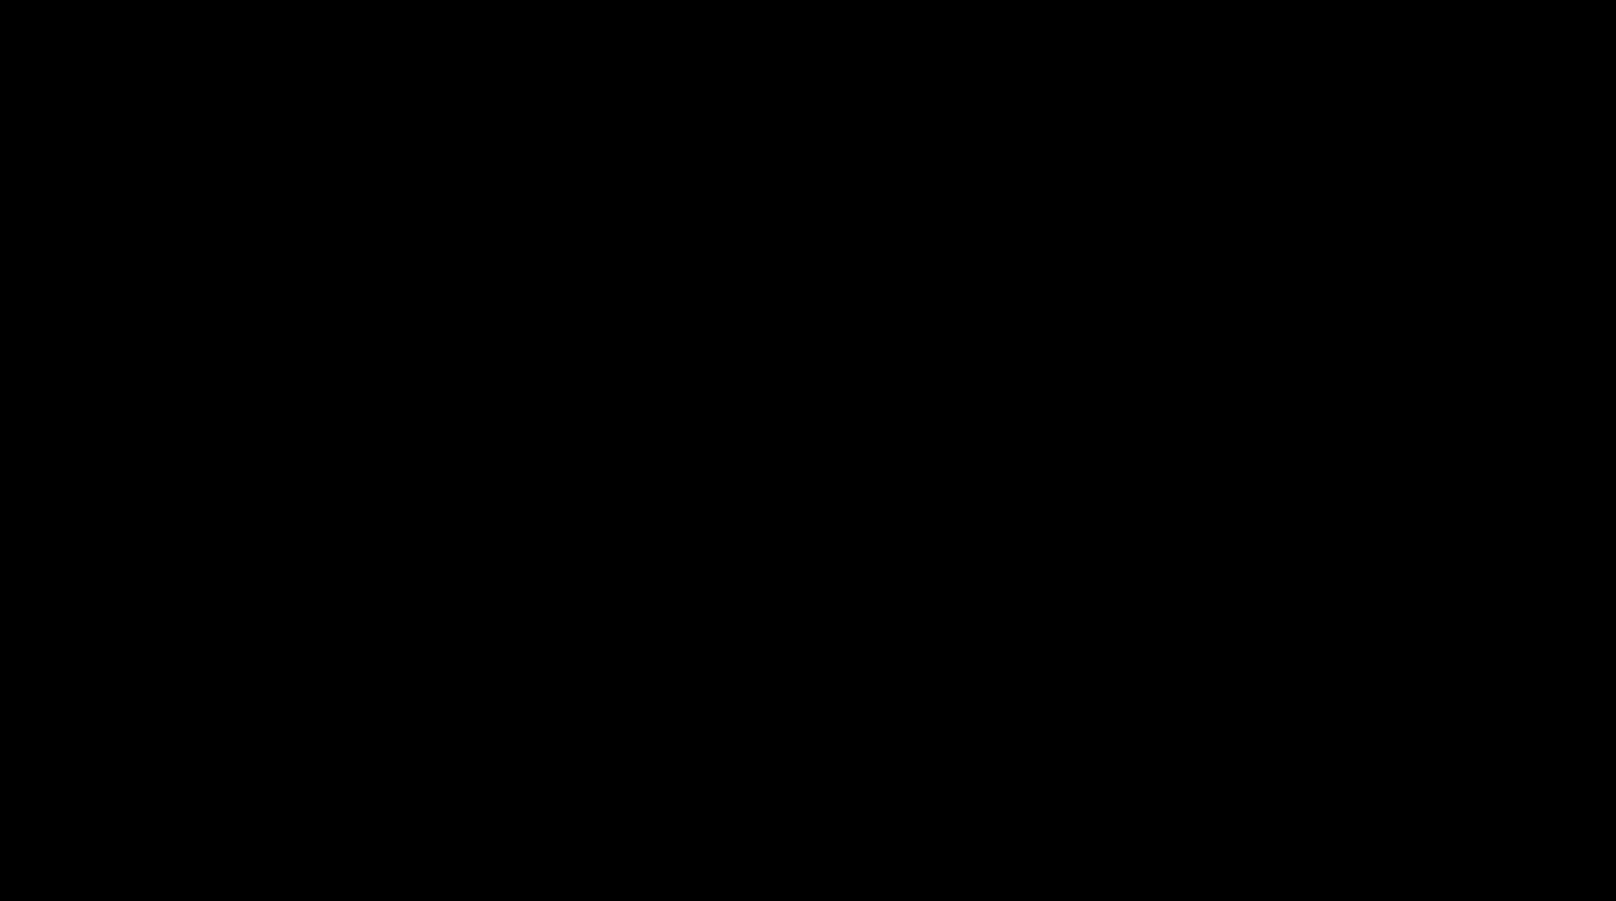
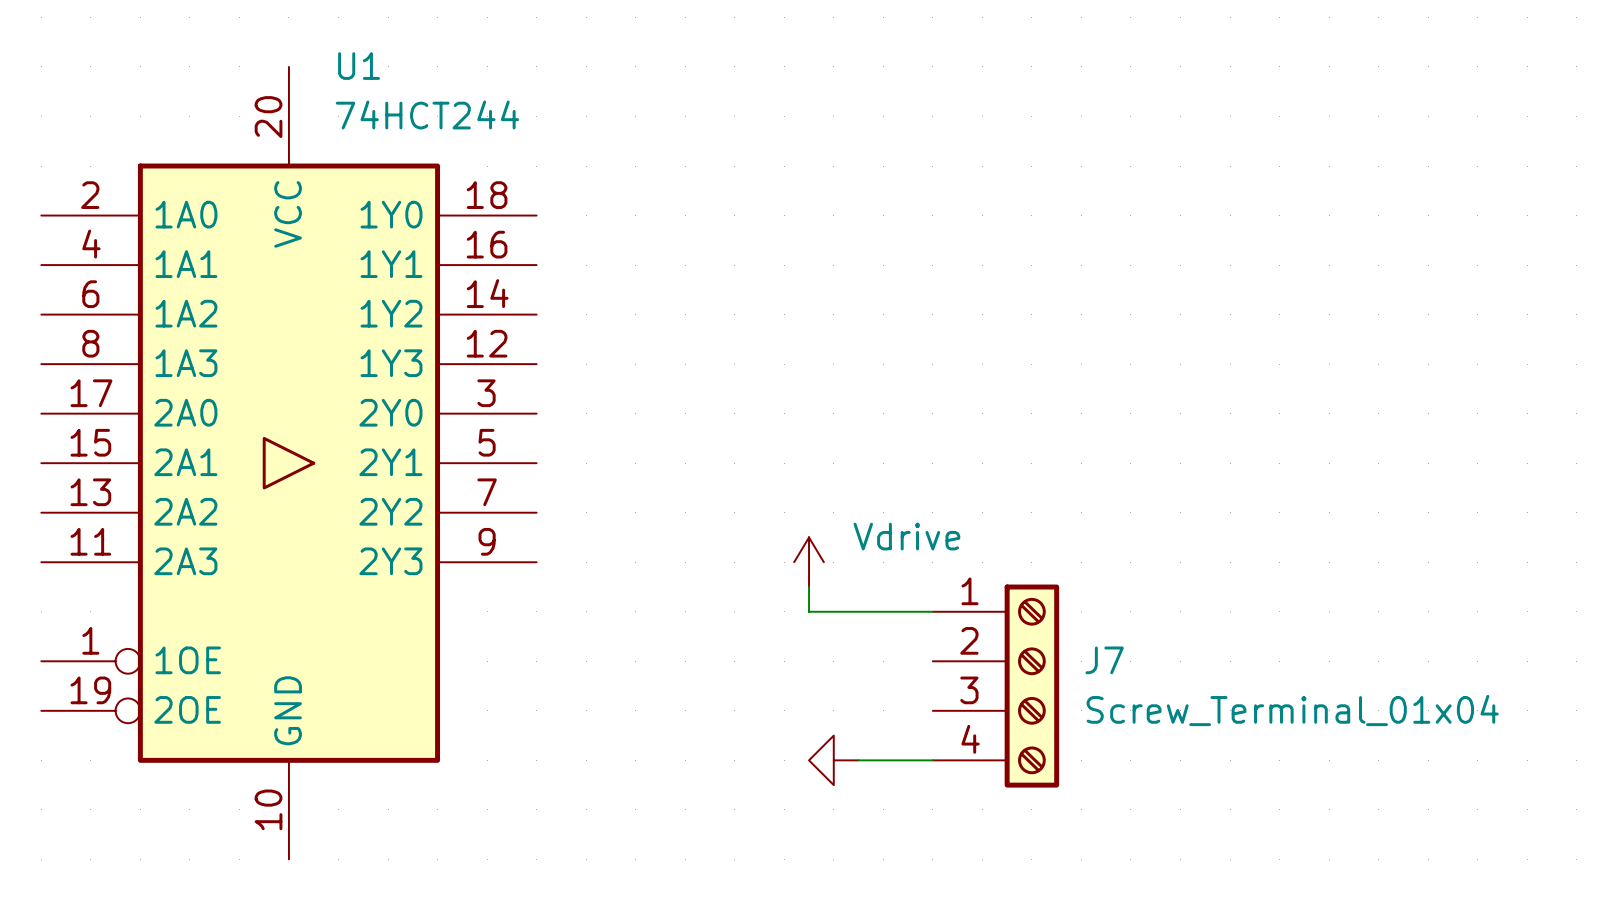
U1: none -> 74HCT244 (288, 463)
power symbol: none -> Vdrive (809, 562)
wire: none -> (809, 587) (809, 611) (932, 611)
J7: none -> Screw_Terminal_01x04 (995, 686)
power symbol: none -> (833, 760)
wire: none -> (858, 760) (932, 760)

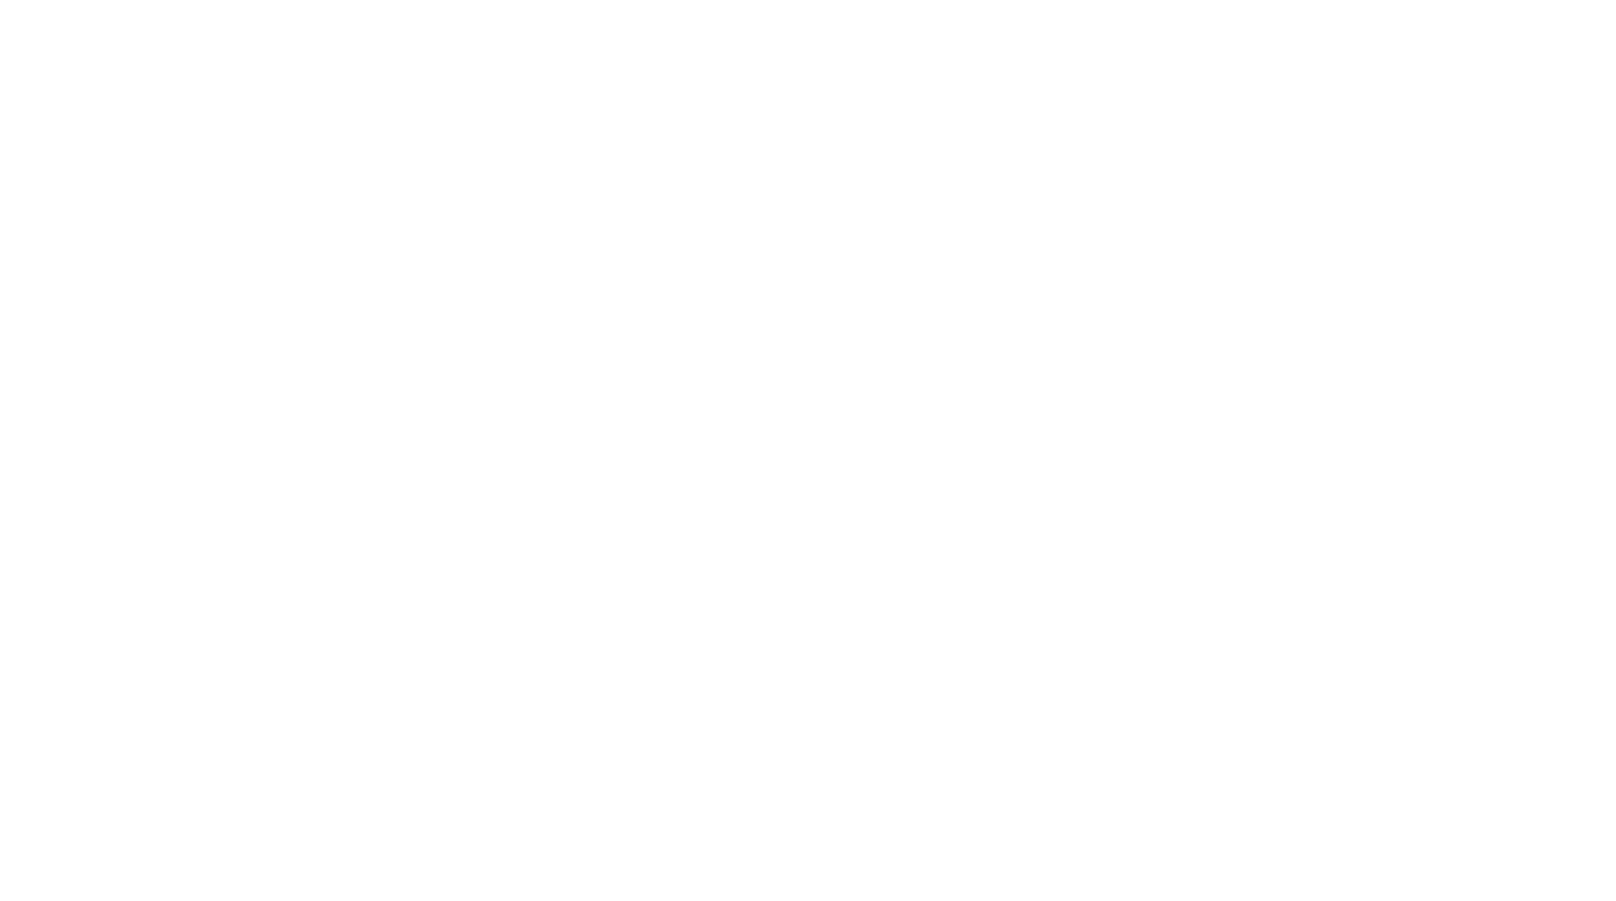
U1: 74HCT244 (288, 463) -> none
power symbol: Vdrive (809, 562) -> none
wire: (809, 587) (809, 611) (932, 611) -> none
J7: Screw_Terminal_01x04 (995, 686) -> none
power symbol: (833, 760) -> none
wire: (858, 760) (932, 760) -> none

